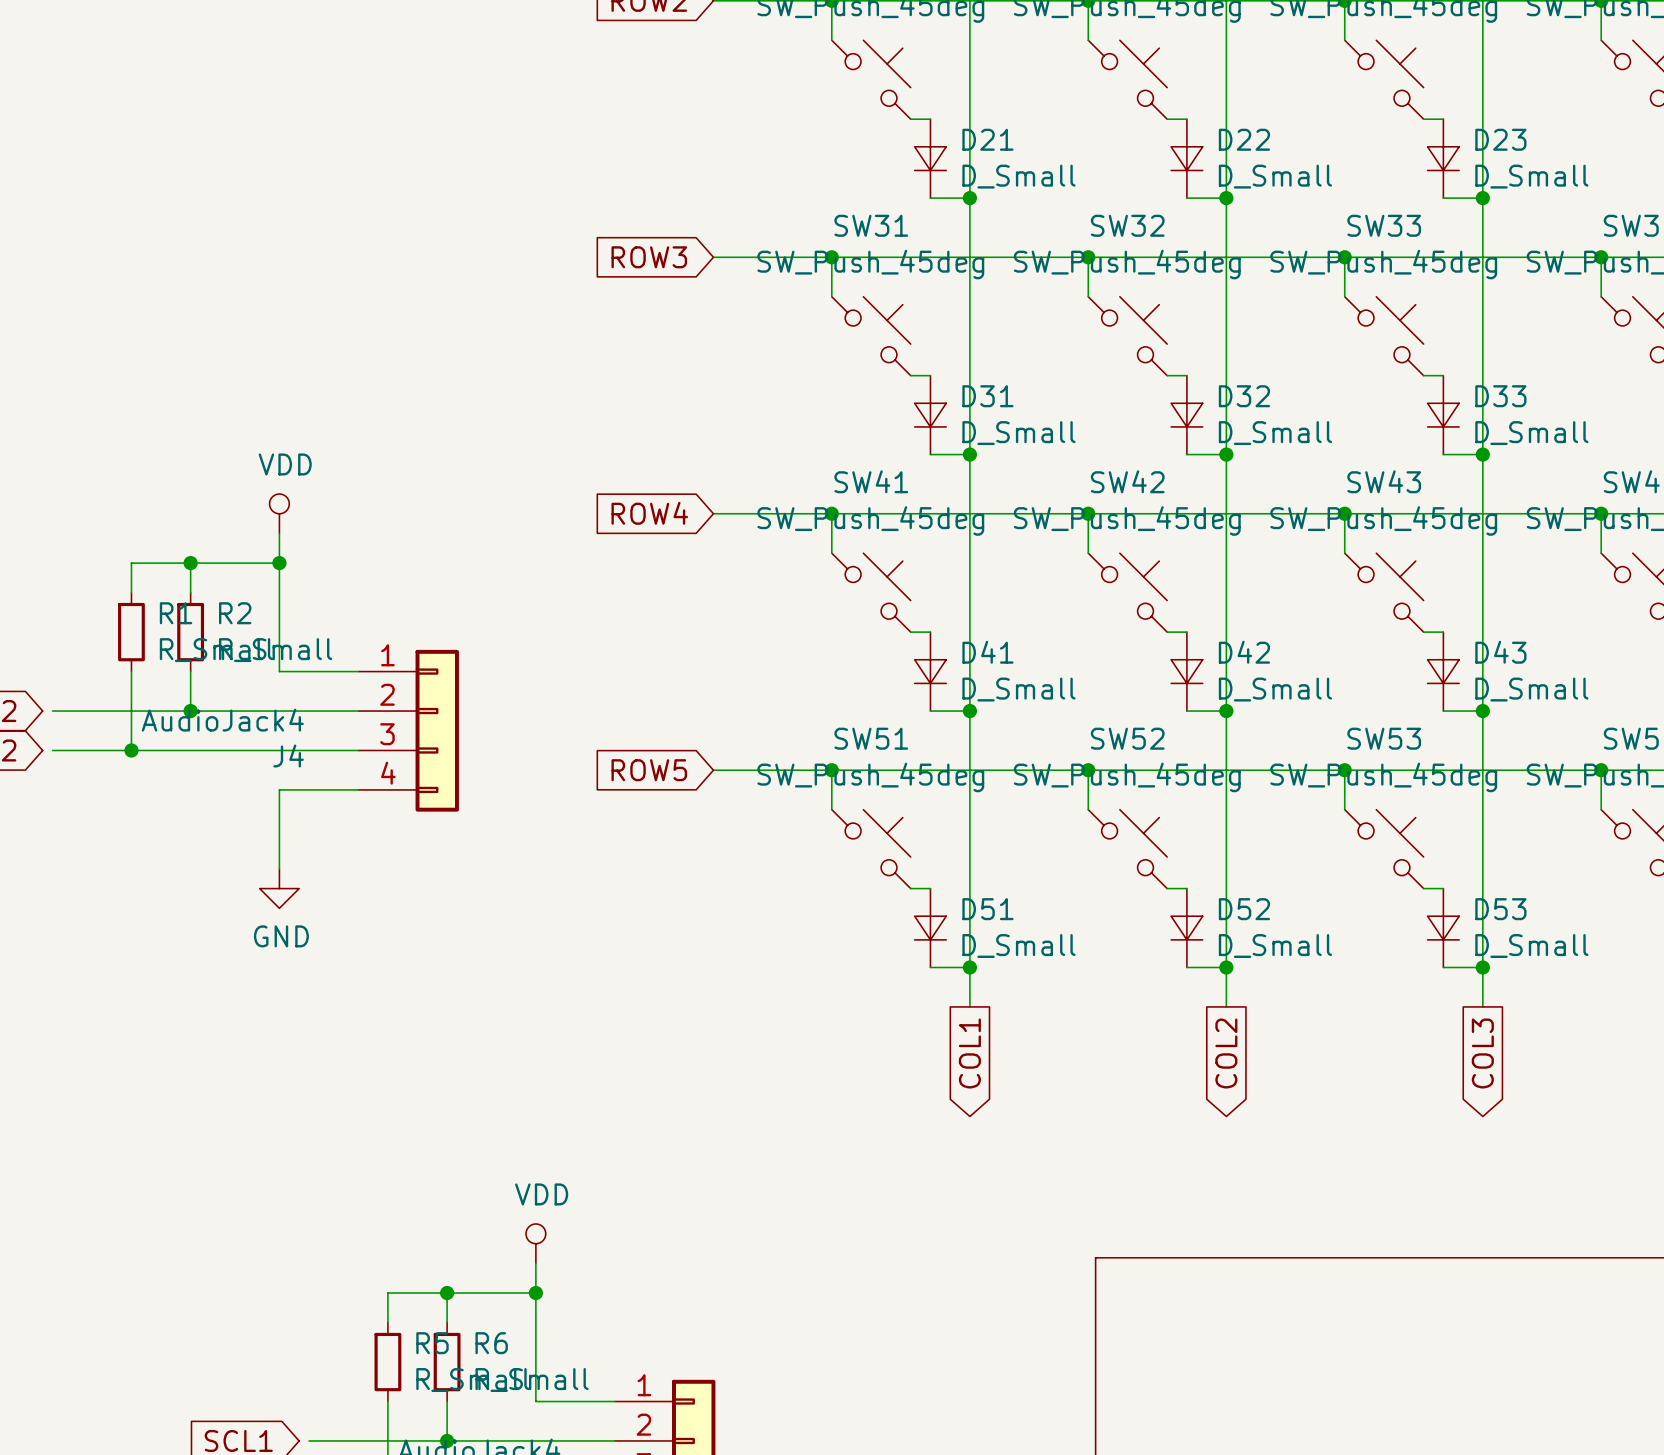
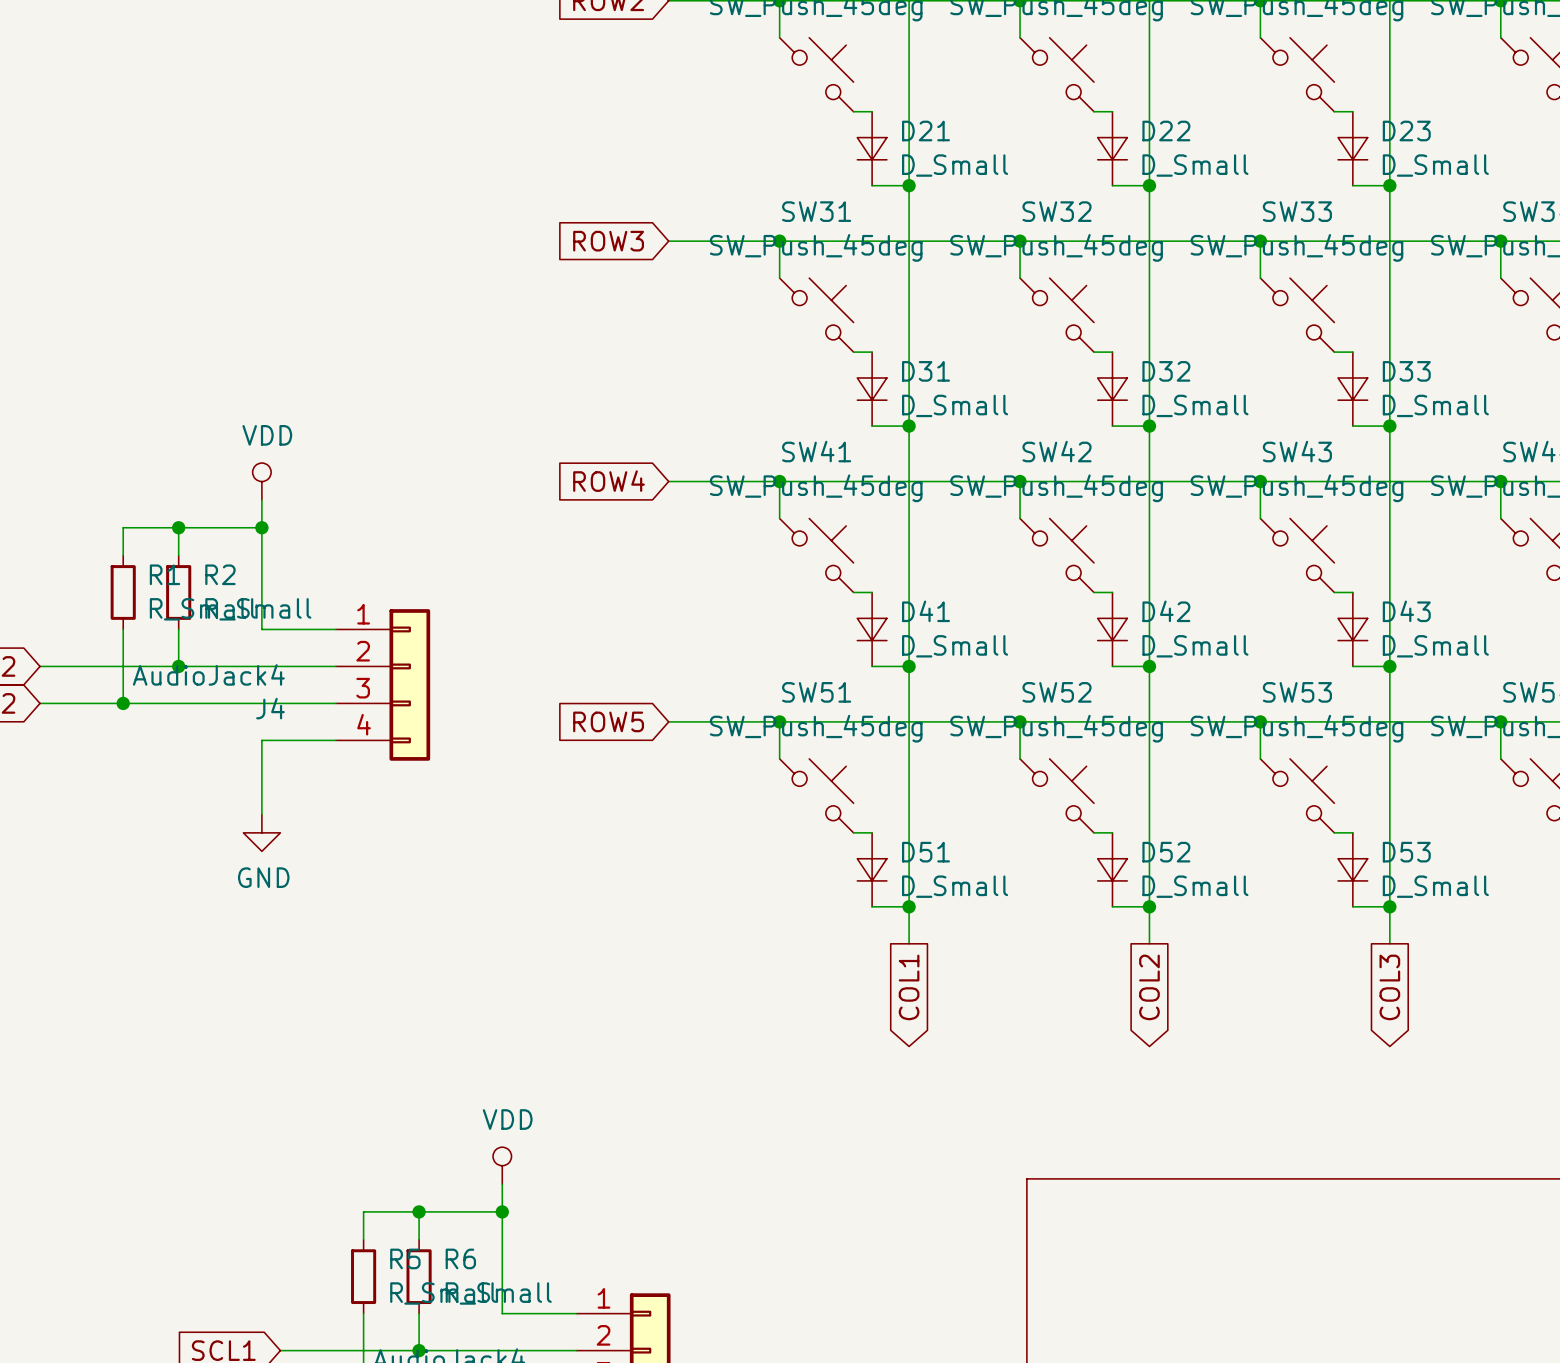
wire: none -> (40, 666) (49, 666)
wire: none -> (40, 703) (49, 703)
wire: none -> (280, 1350) (289, 1350)

